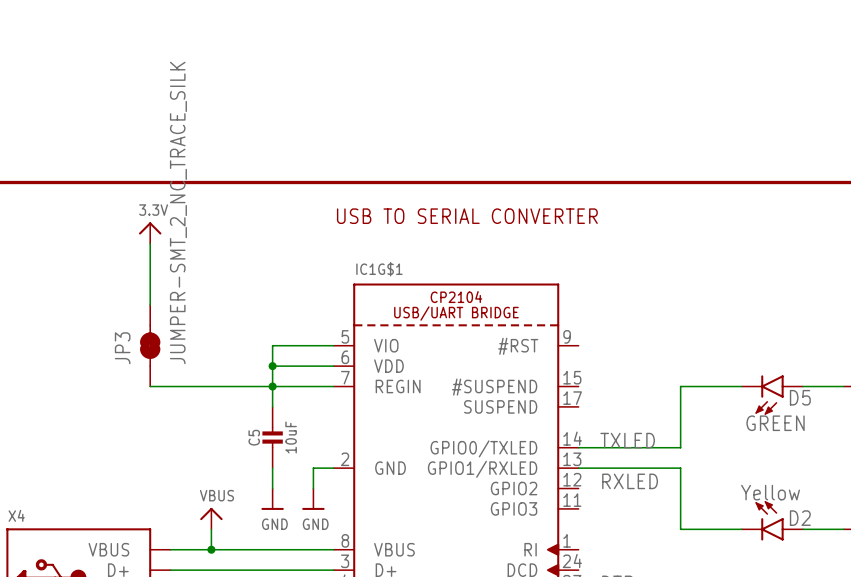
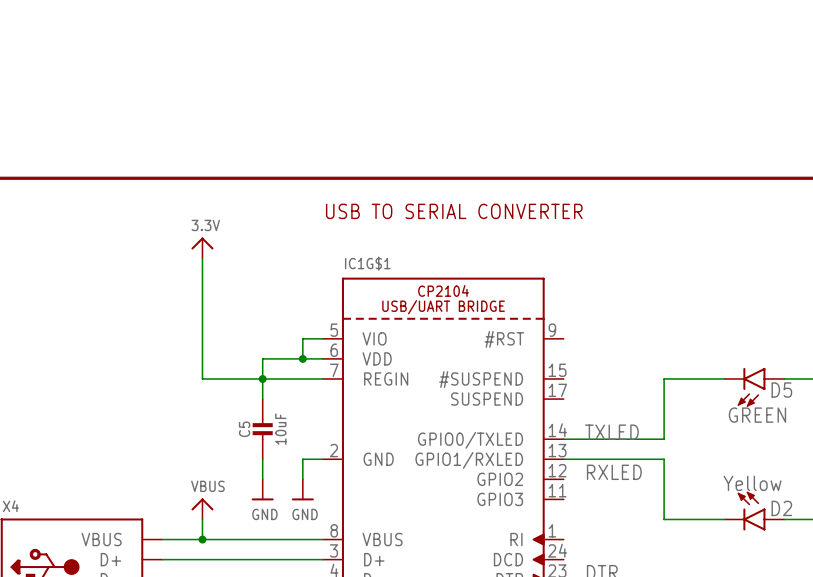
power symbol position: 3.3V (150, 233) -> 3.3V (202, 248)
wire: (150, 243) (150, 304) -> none
JP3: JUMPER-SMT_2_NC_TRACE_SILK (150, 345) -> none
wire: (313, 345) (272, 345) (272, 366) -> (302, 338) (302, 358)
junction position: (272, 366) -> (302, 358)
wire: (150, 386) (211, 386) -> (202, 258) (202, 378)

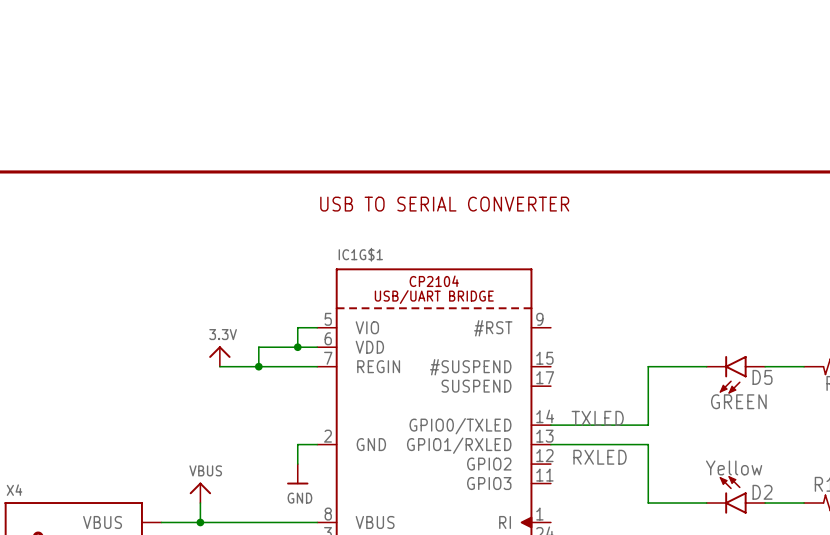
power symbol position: 3.3V (202, 248) -> 3.3V (219, 356)
wire: (202, 258) (202, 378) (222, 378) -> none
wire: (262, 378) (262, 399) -> none
C5: 10uF (262, 429) -> none
wire: (262, 459) (262, 479) -> none
power symbol: GND (262, 489) -> none

